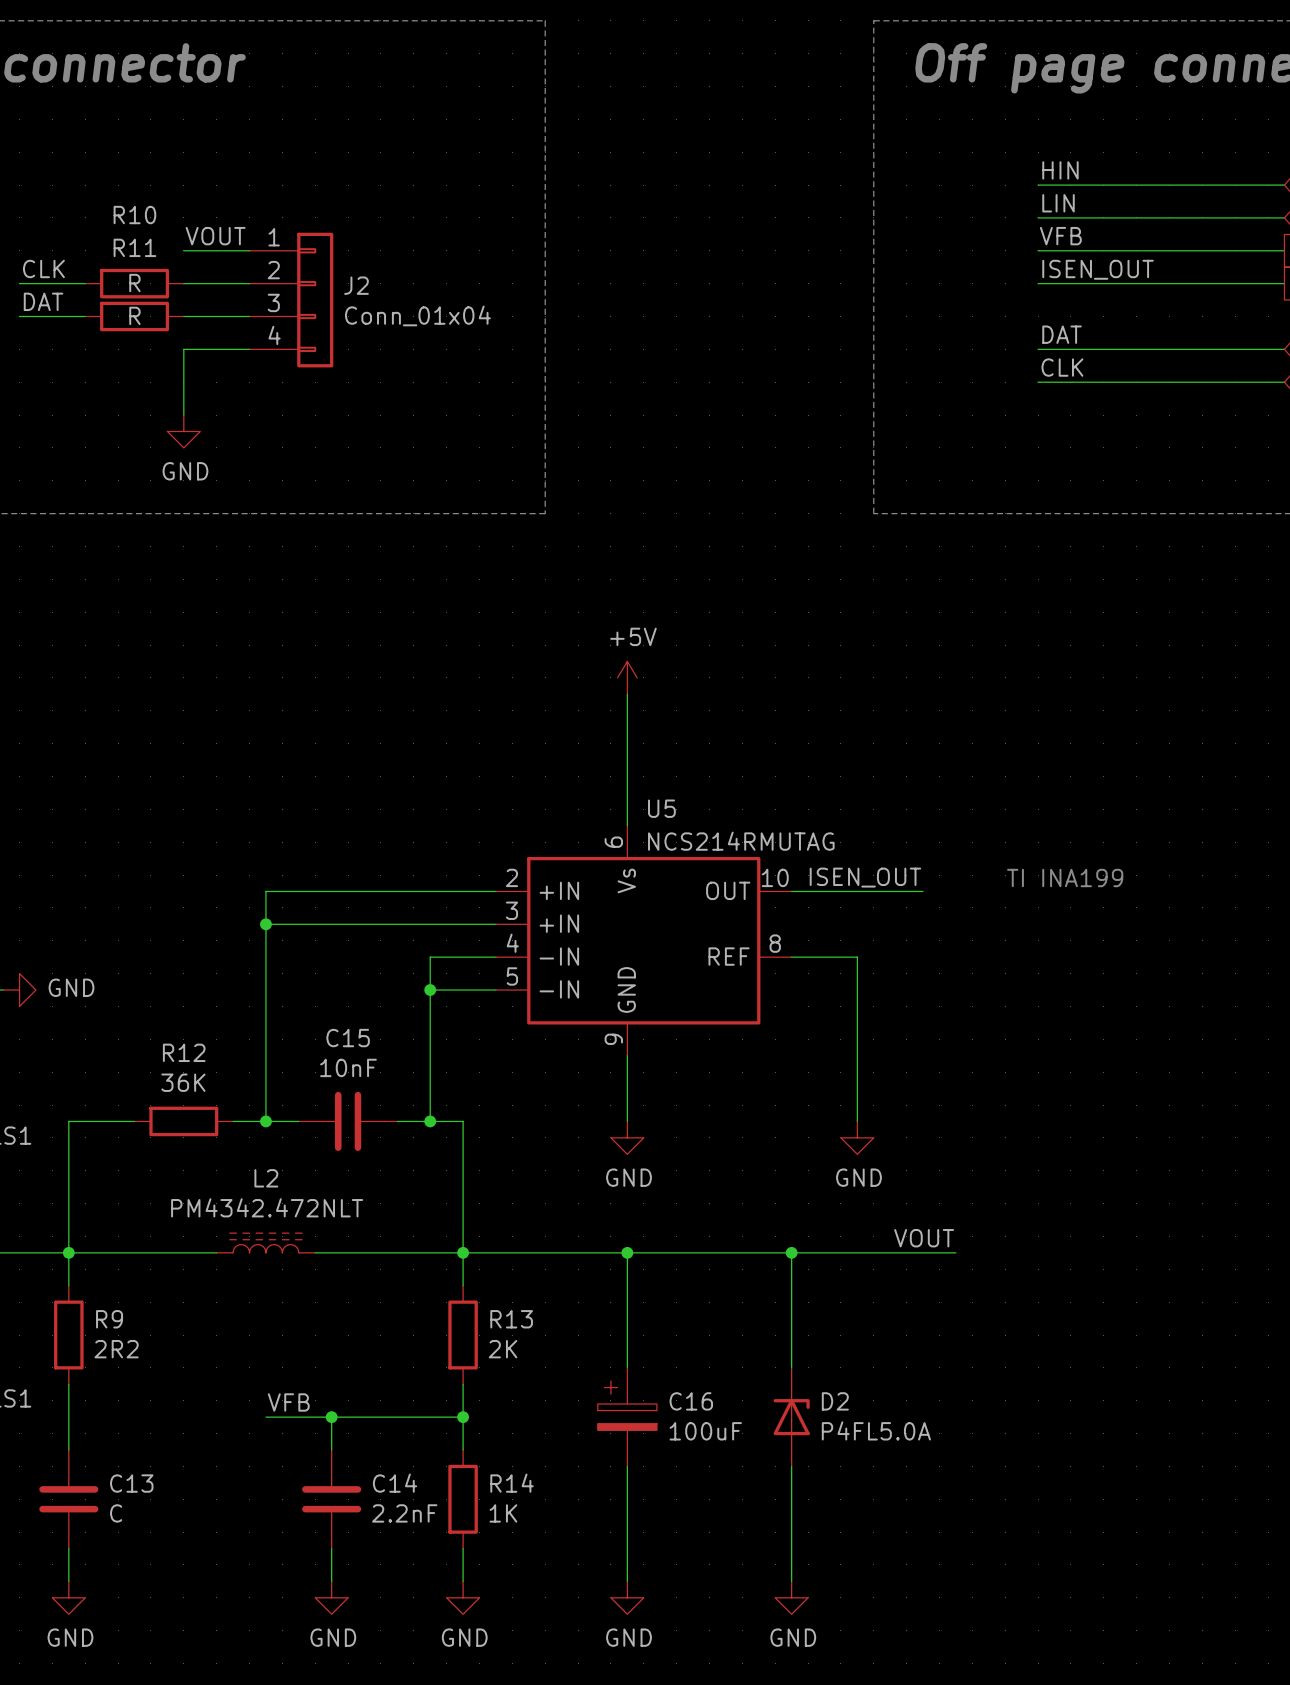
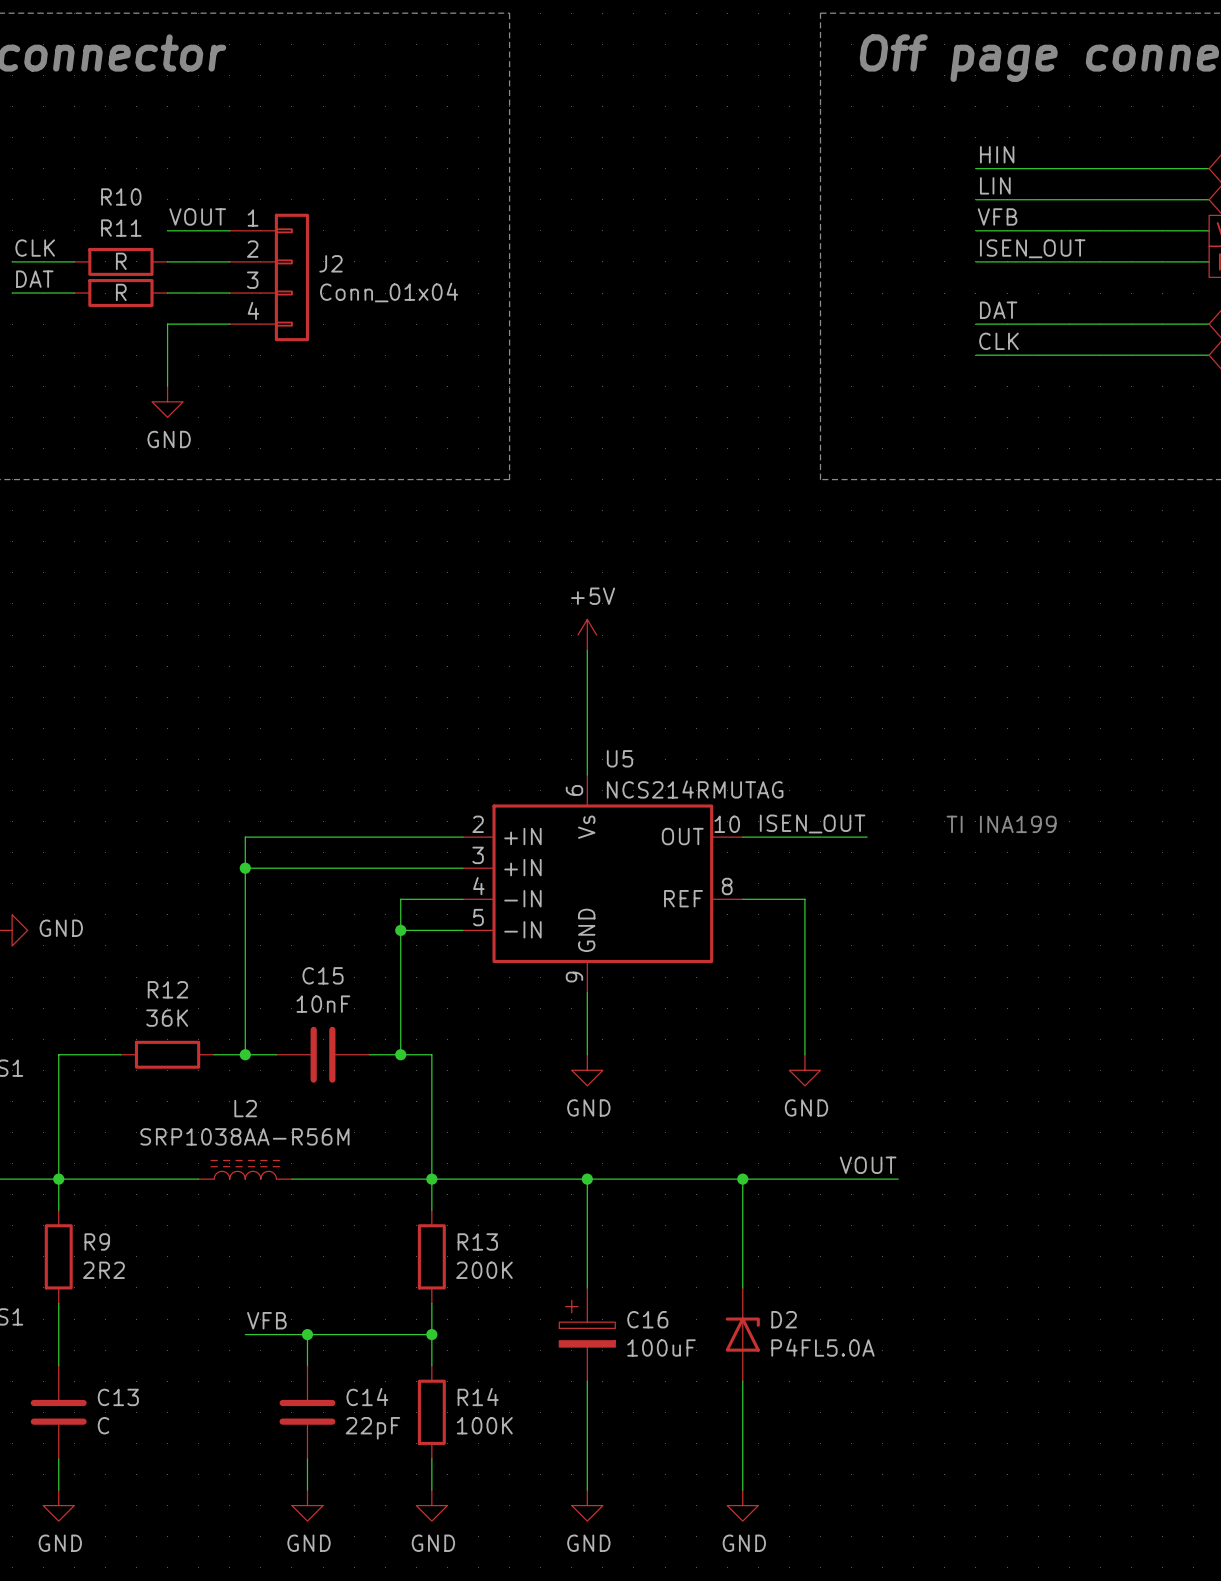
L2 value: PM4342.472NLT (267, 1207) -> SRP1038AA-R56M (244, 1136)
R13 value: 2K (503, 1349) -> 200K (484, 1270)
C14 value: 2.2nF (404, 1513) -> 22pF (372, 1428)
R14 value: 1K (503, 1513) -> 100K (484, 1425)

